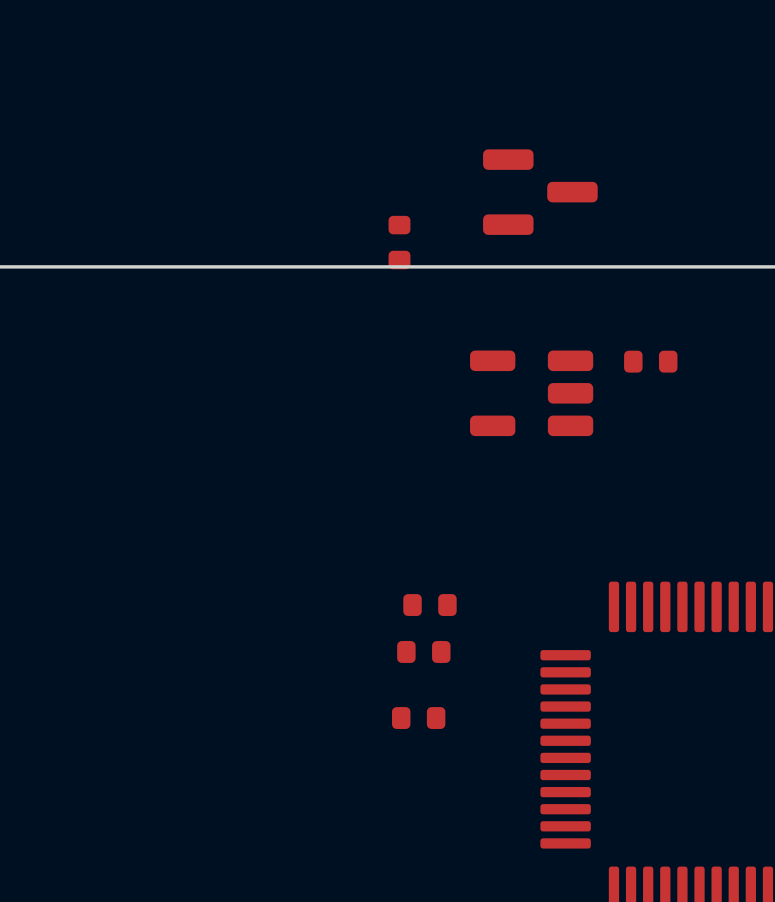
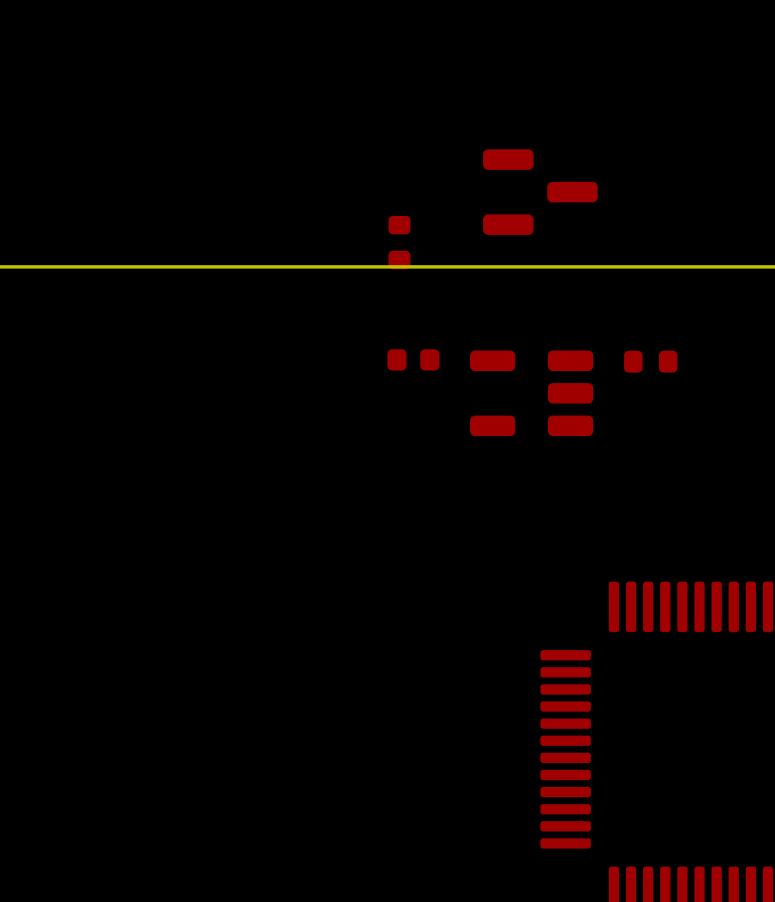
part: none -> (413, 359)
part: (429, 605) -> none
part: (423, 651) -> none
part: (418, 718) -> none

